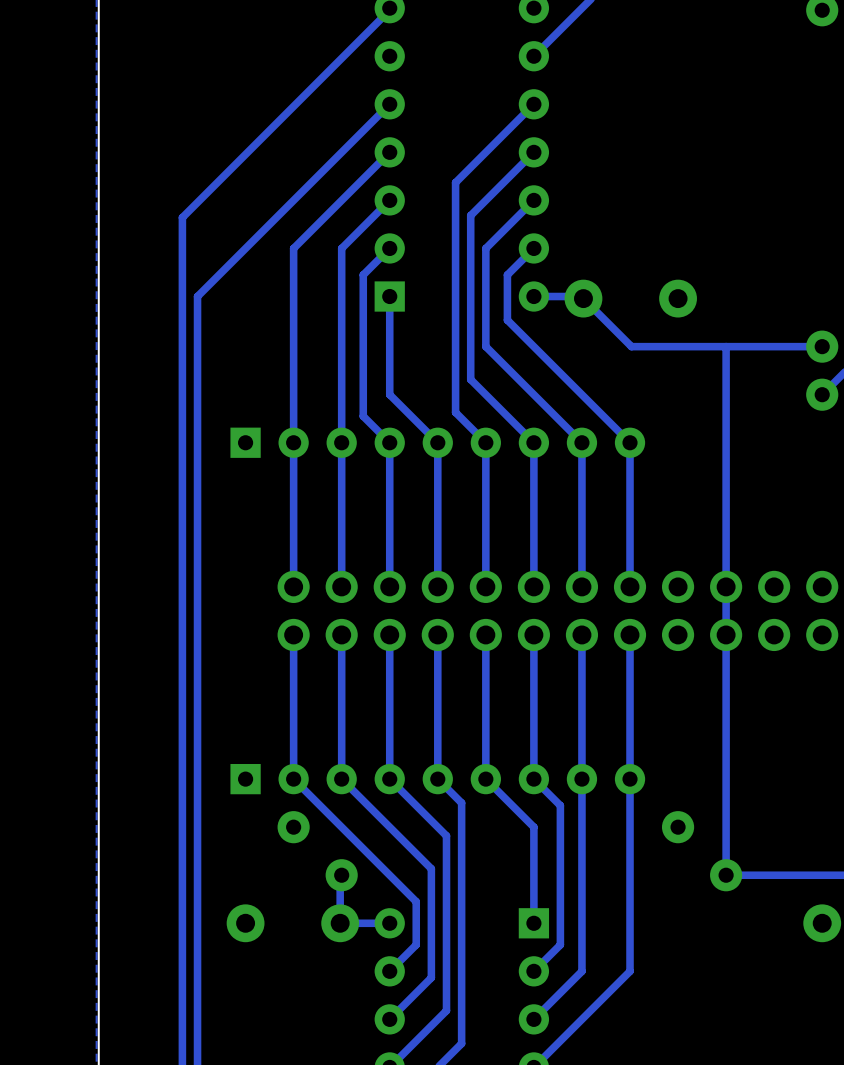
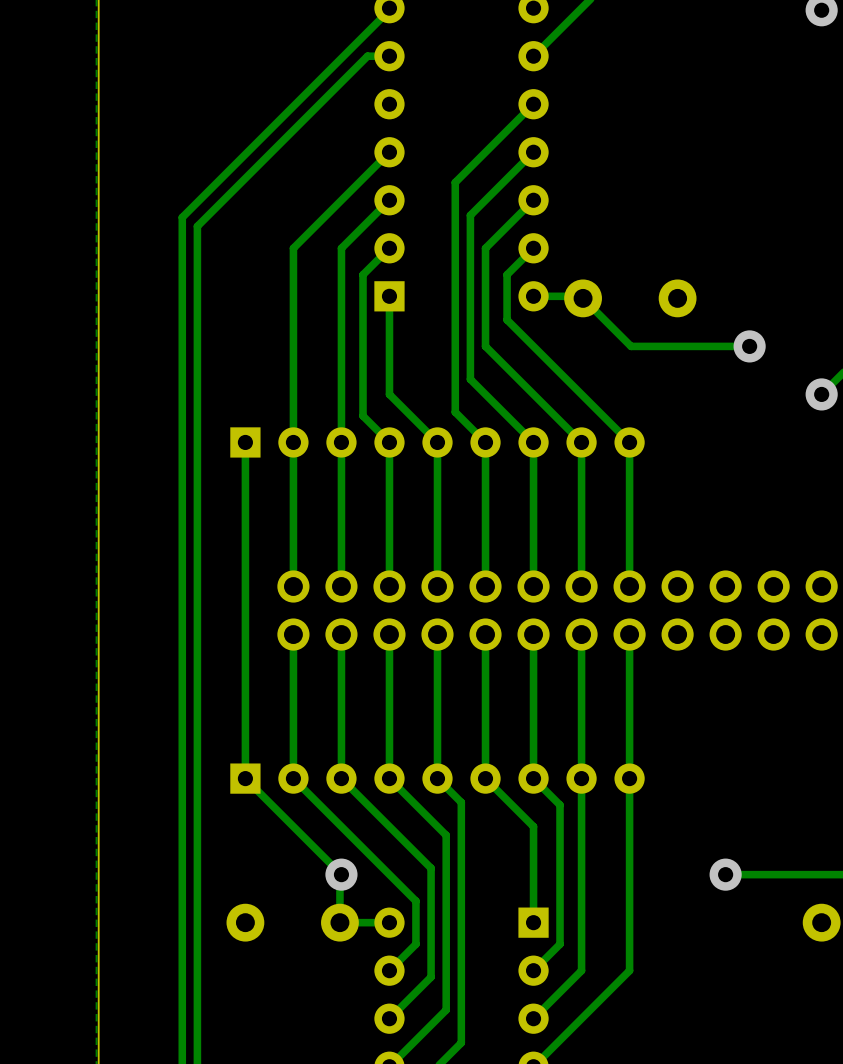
track: (389, 104) (197, 296) -> (389, 56) (367, 56) (197, 226) (197, 296)
track: (726, 346) (726, 875) -> none
track: (822, 346) (750, 346) -> none
via position: (822, 346) -> (749, 346)
track: none -> (245, 442) (245, 778) (341, 874)
via: (293, 827) -> none
via: (678, 827) -> none

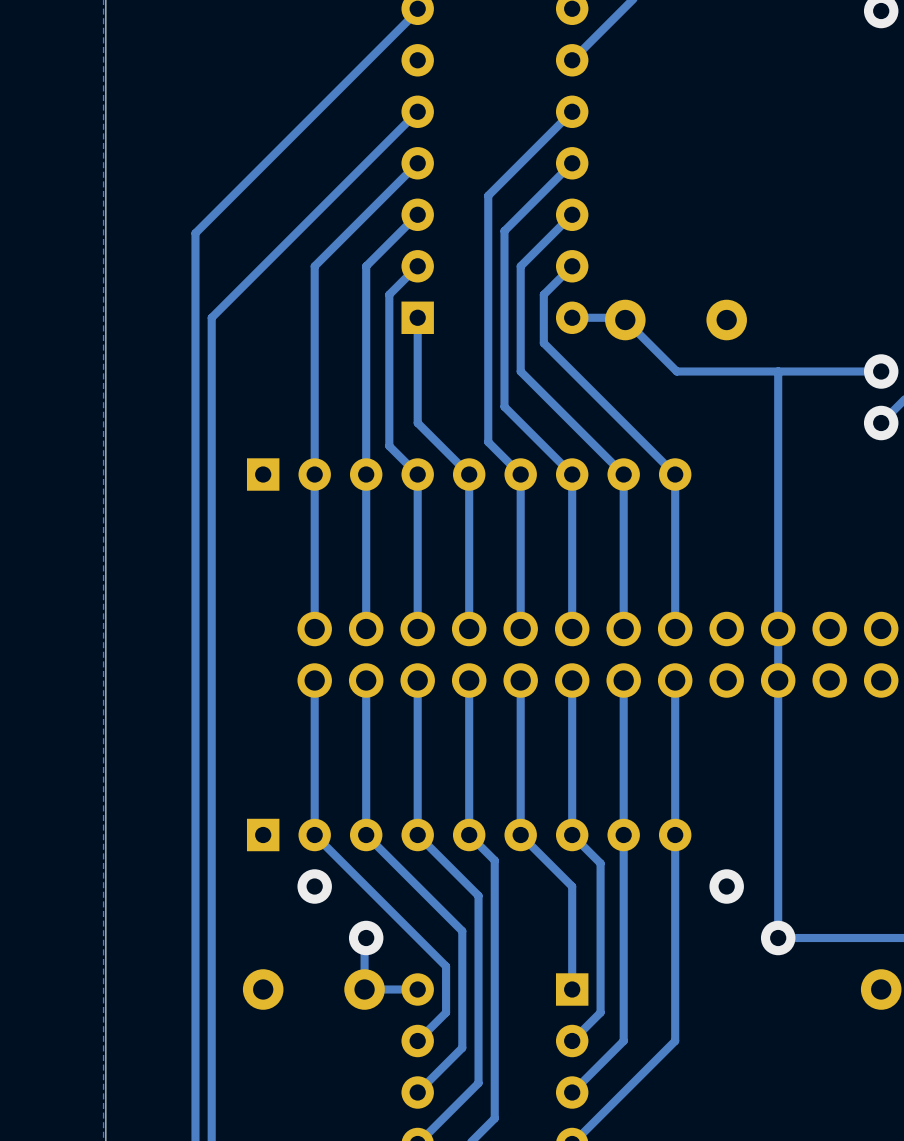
track: (389, 56) (367, 56) (197, 226) (197, 296) -> (417, 111) (211, 317)
track: none -> (778, 371) (778, 938)
via position: (749, 346) -> (881, 371)
track: none -> (881, 371) (803, 371)
track: (245, 442) (245, 778) (341, 874) -> none
via: none -> (314, 886)
via: none -> (726, 886)

